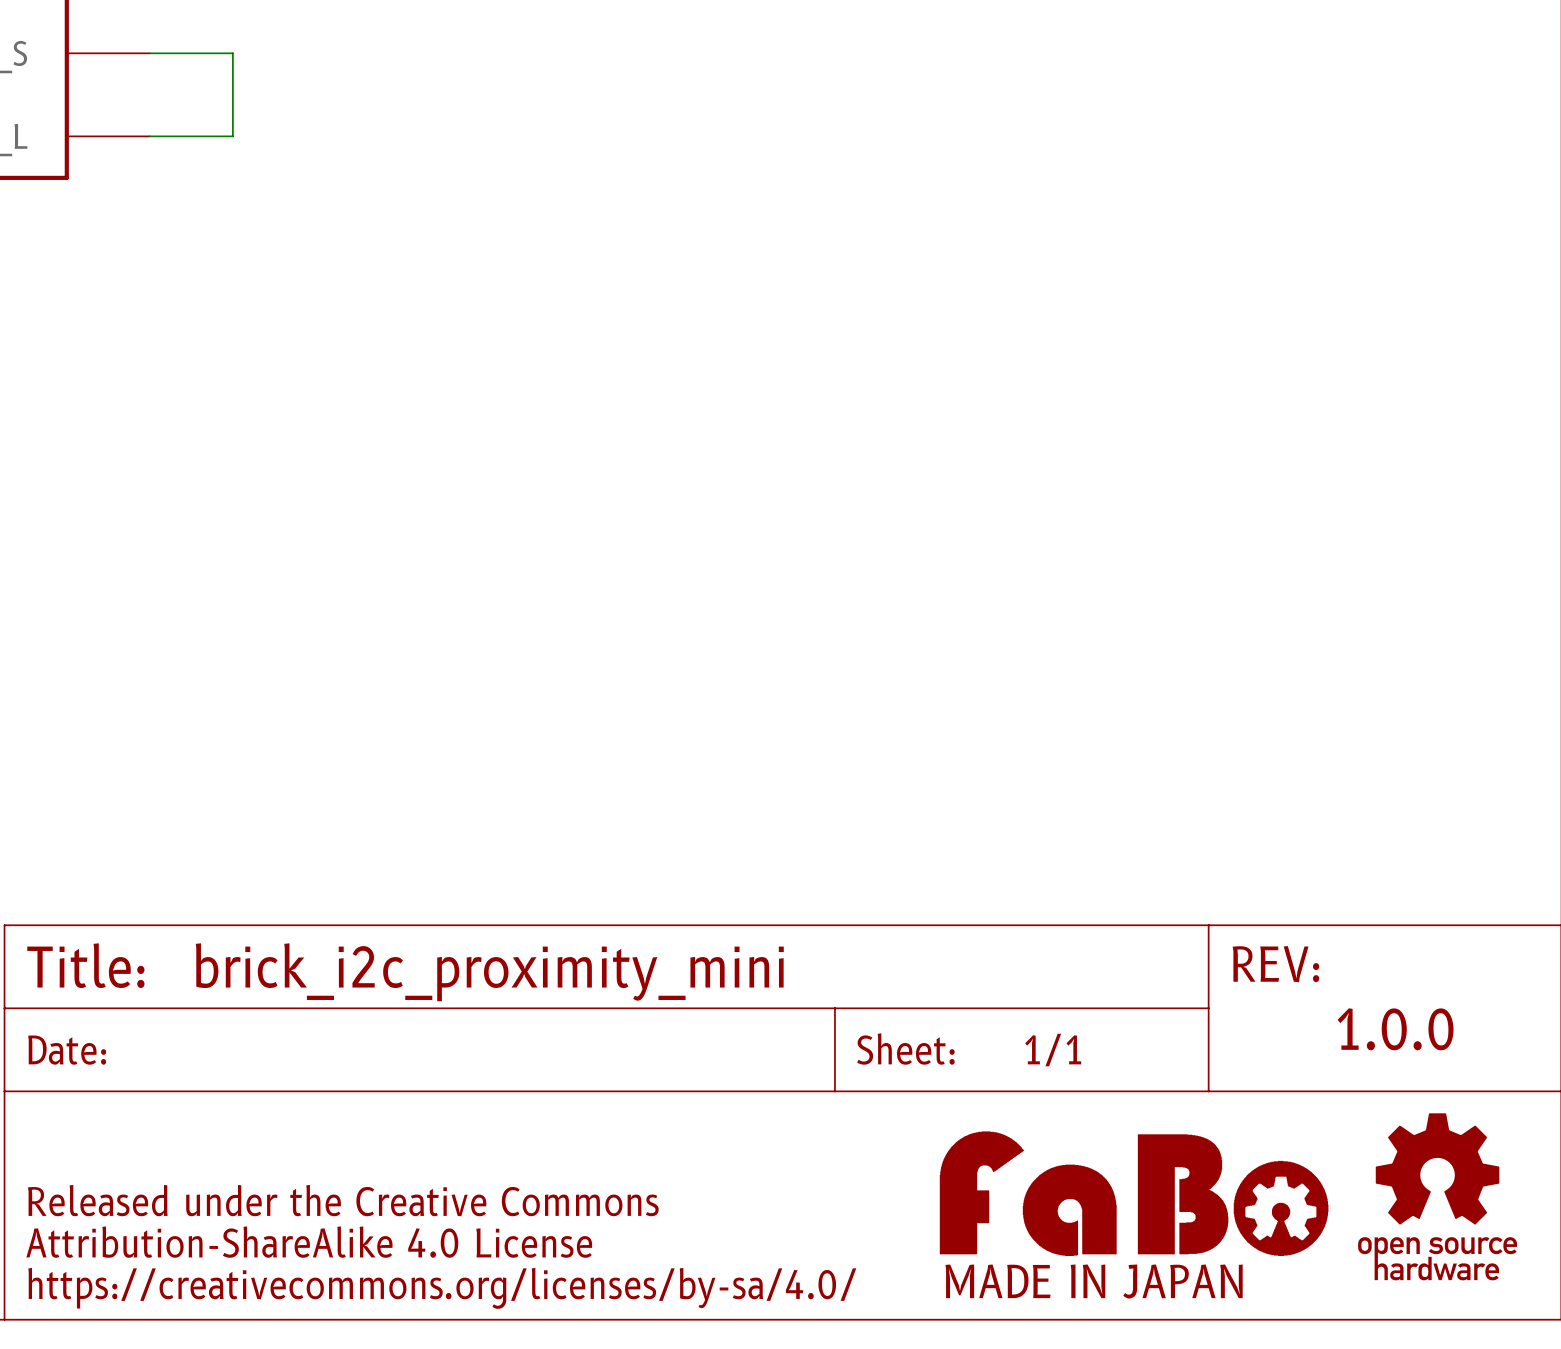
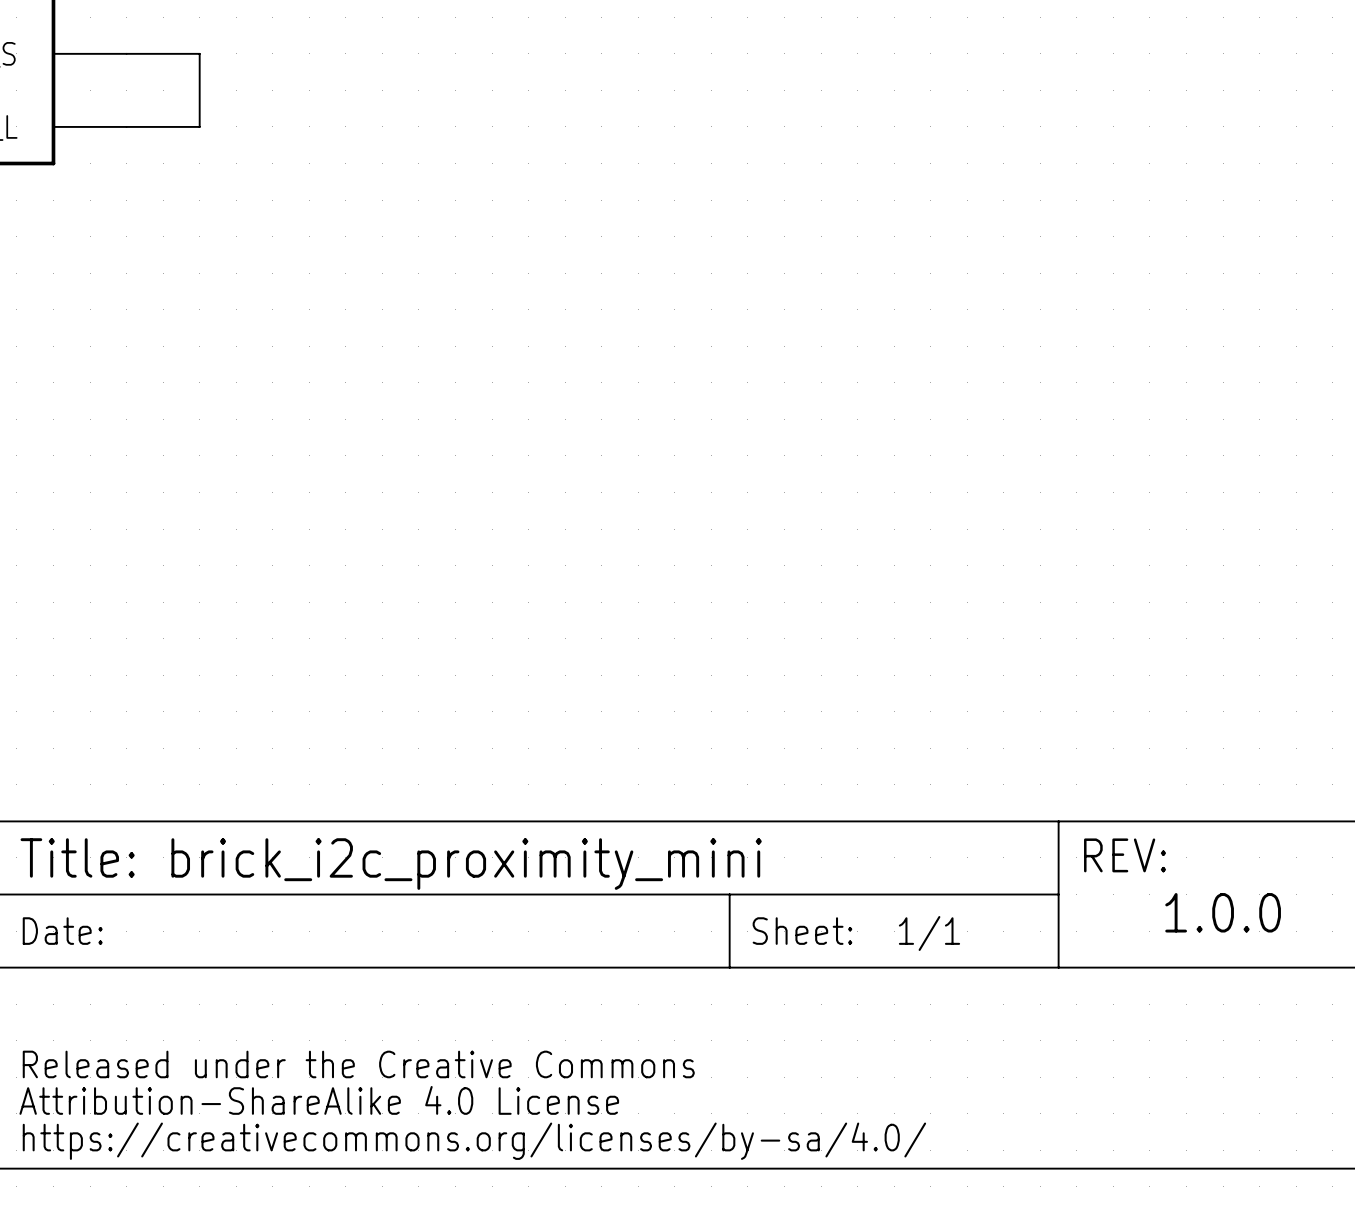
part: (1134, 1193) -> none
part: (1437, 1196) -> none

